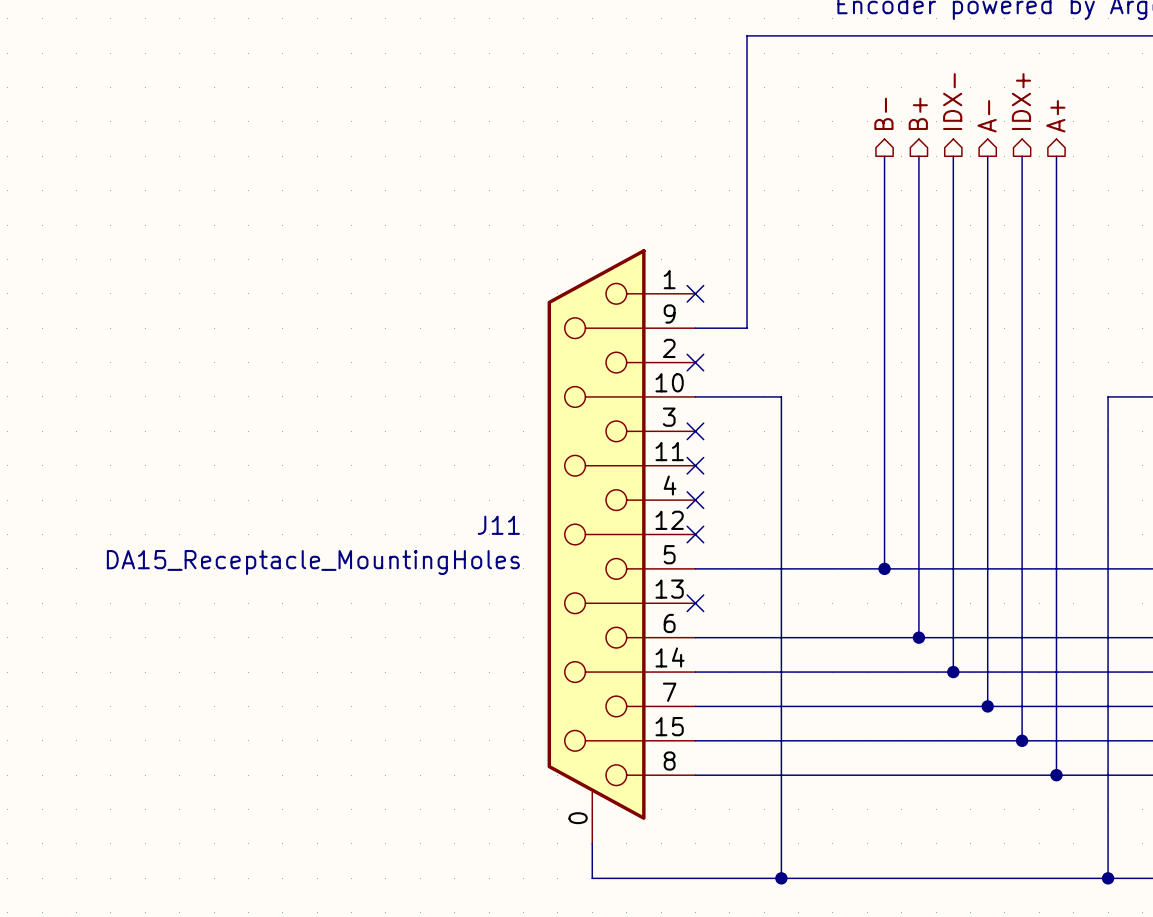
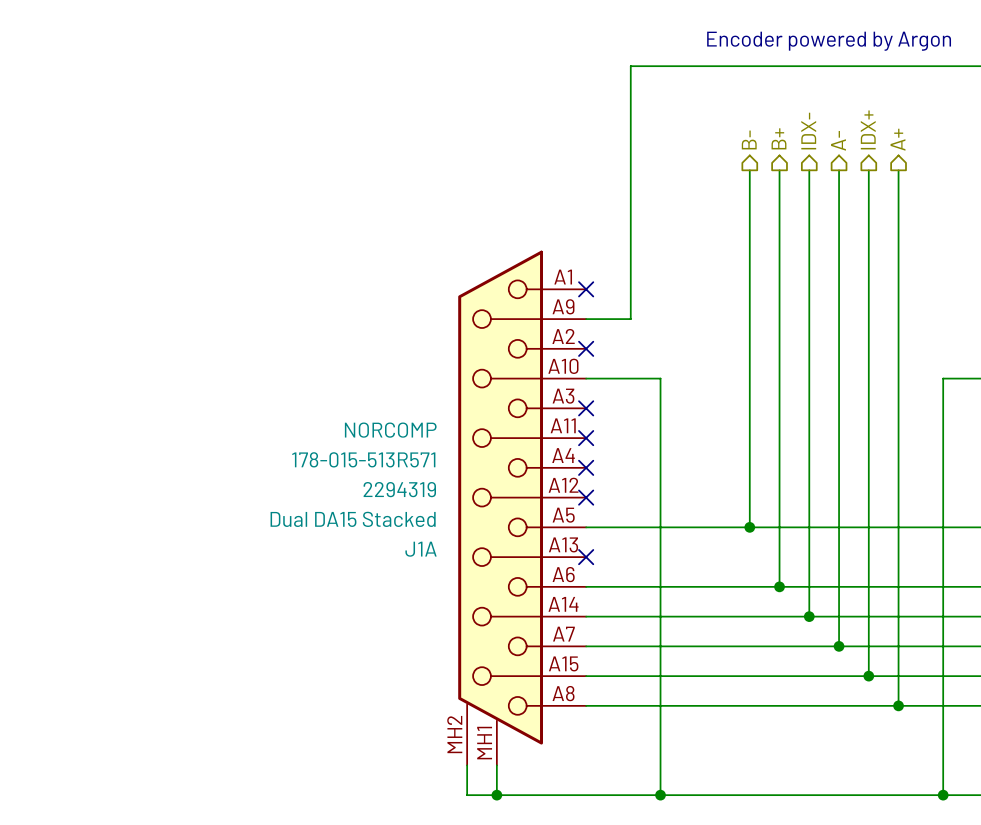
J11: DA15_Receptacle_MountingHoles (621, 546) -> none
J1A: none -> Dual DA15 Stacked (522, 508)
wire: none -> (467, 765) (467, 795) (496, 795)
junction: none -> (496, 795)

